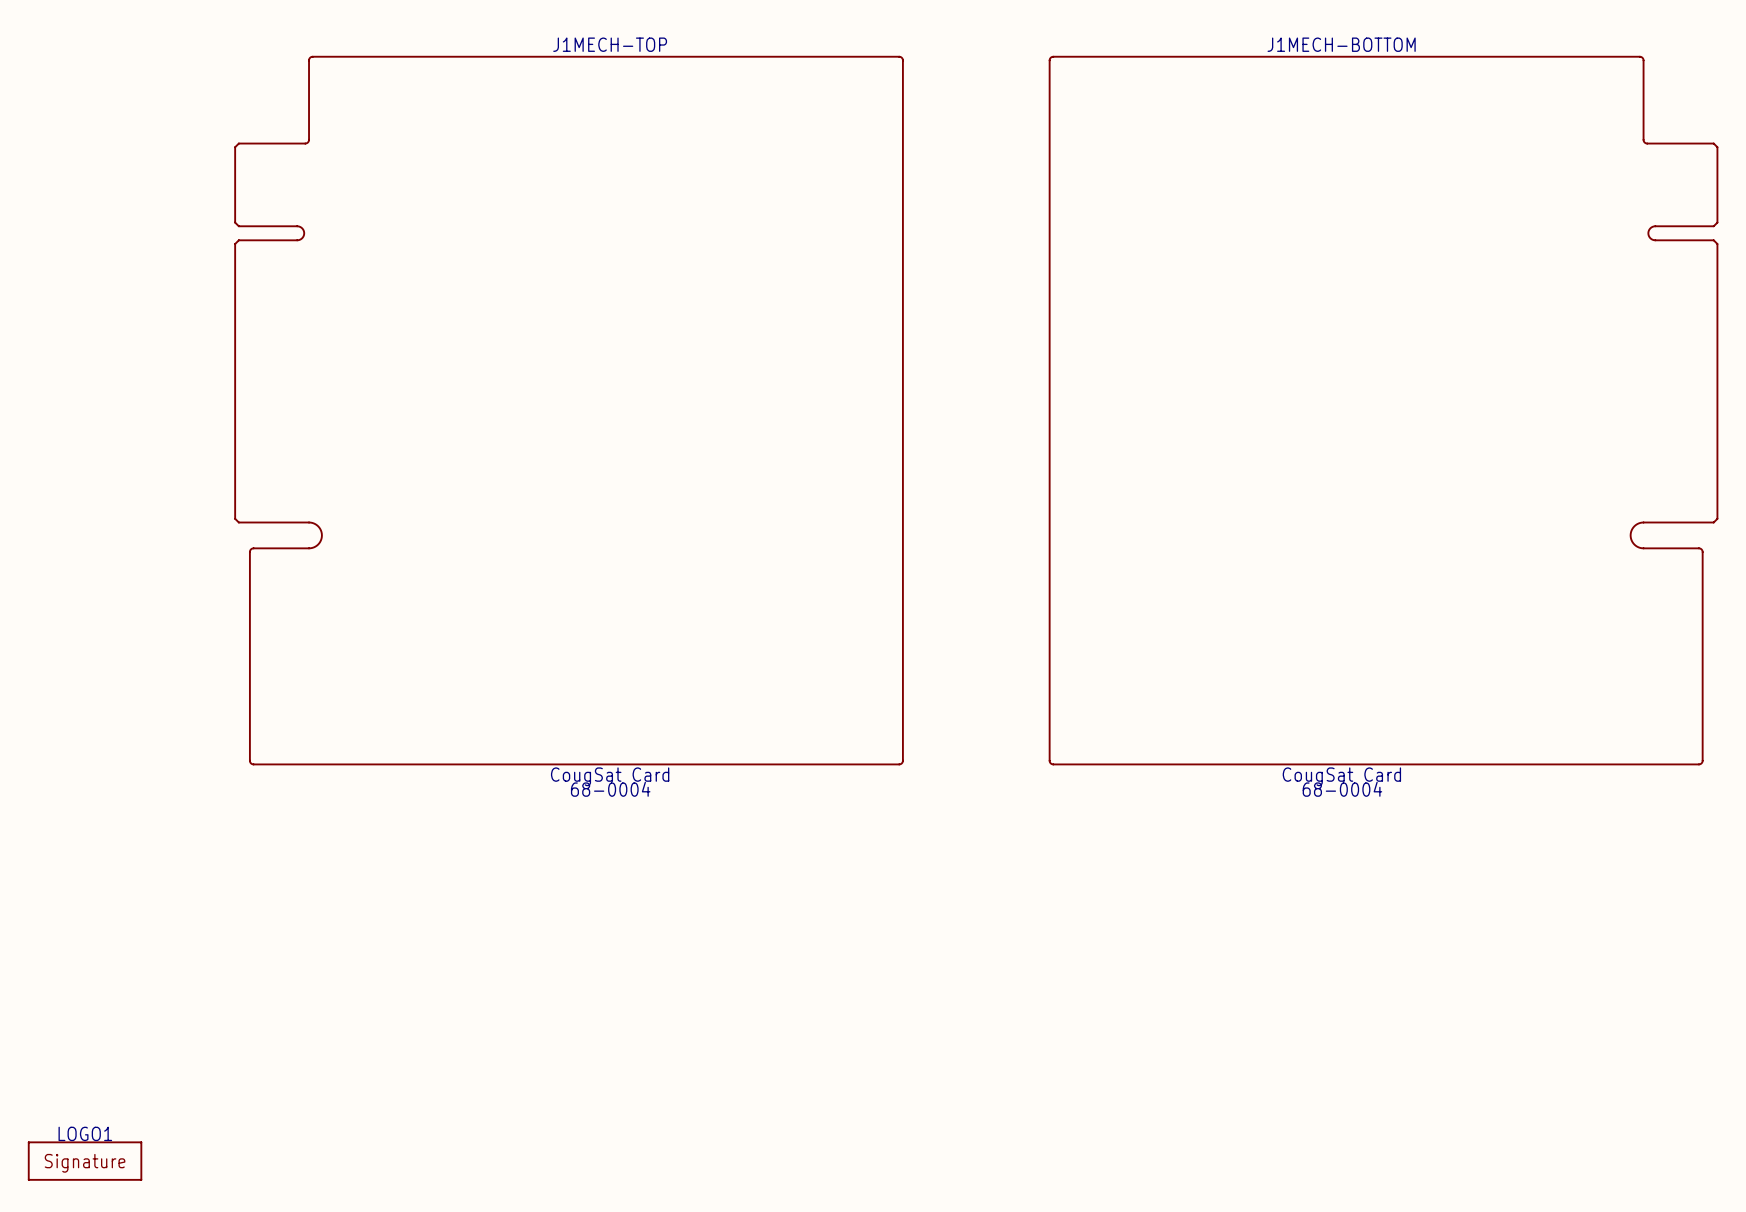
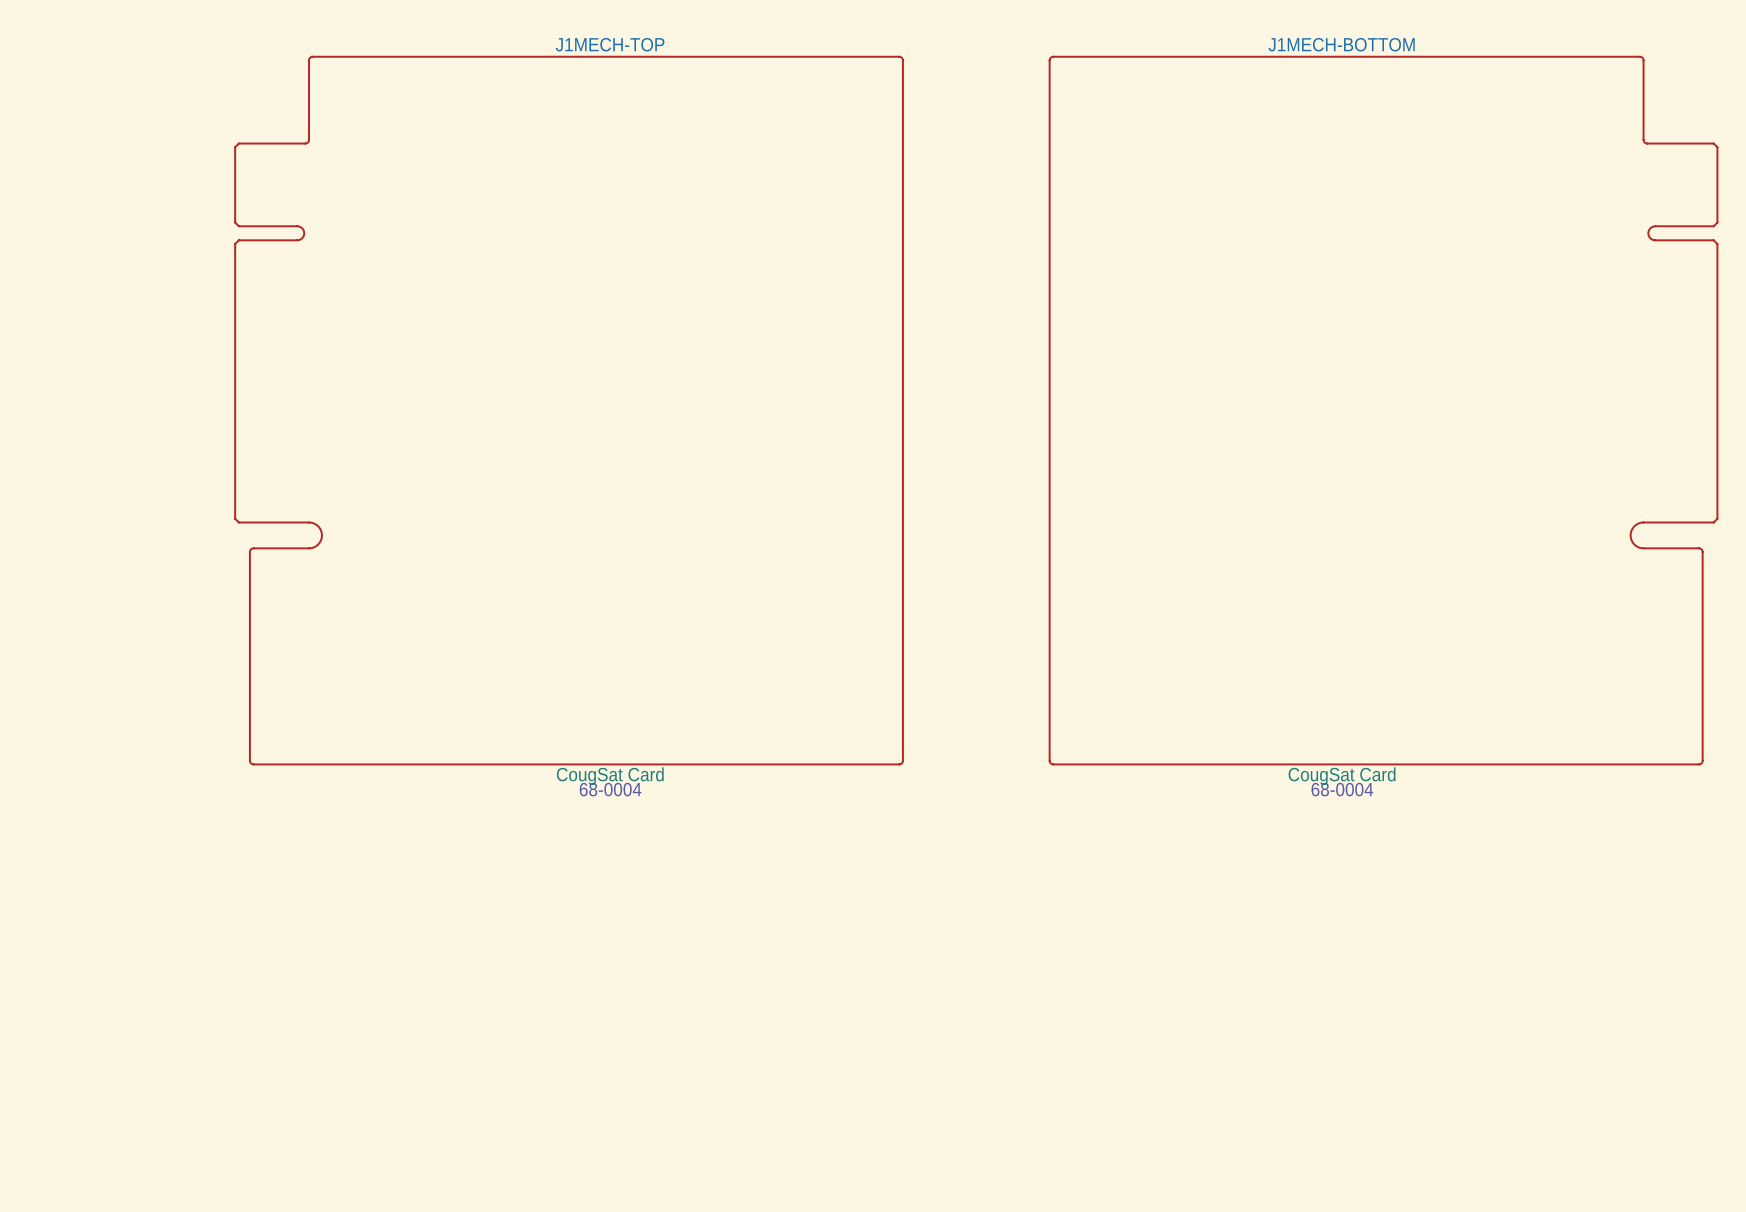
LOGO1: (85, 1161) -> none

